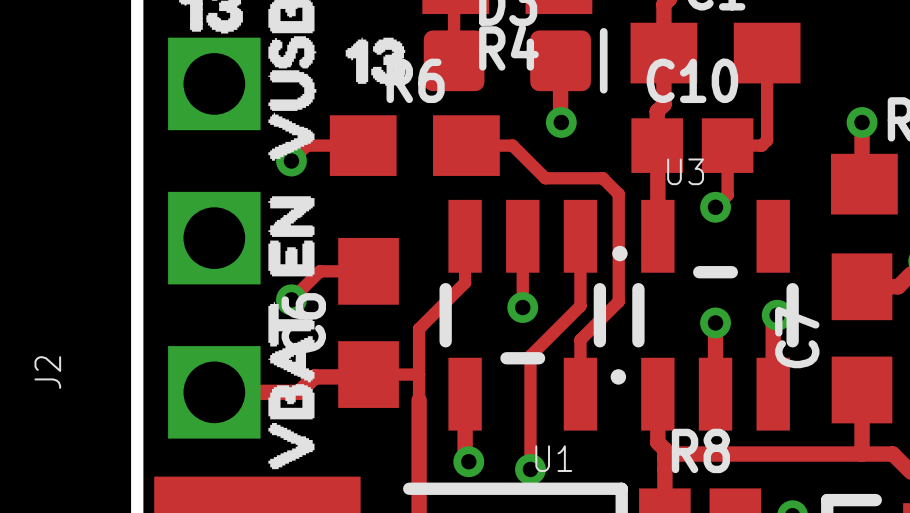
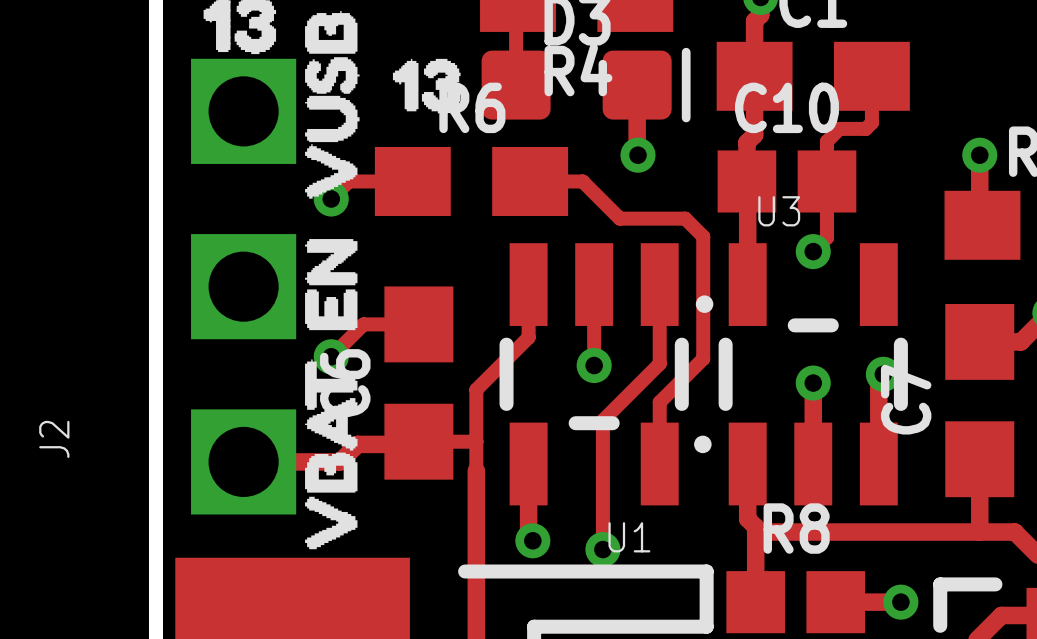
track: (767, 94) (767, 140) (761, 145) (727, 145) -> (871, 122) (865, 128) (839, 128) (826, 141) (826, 181)

